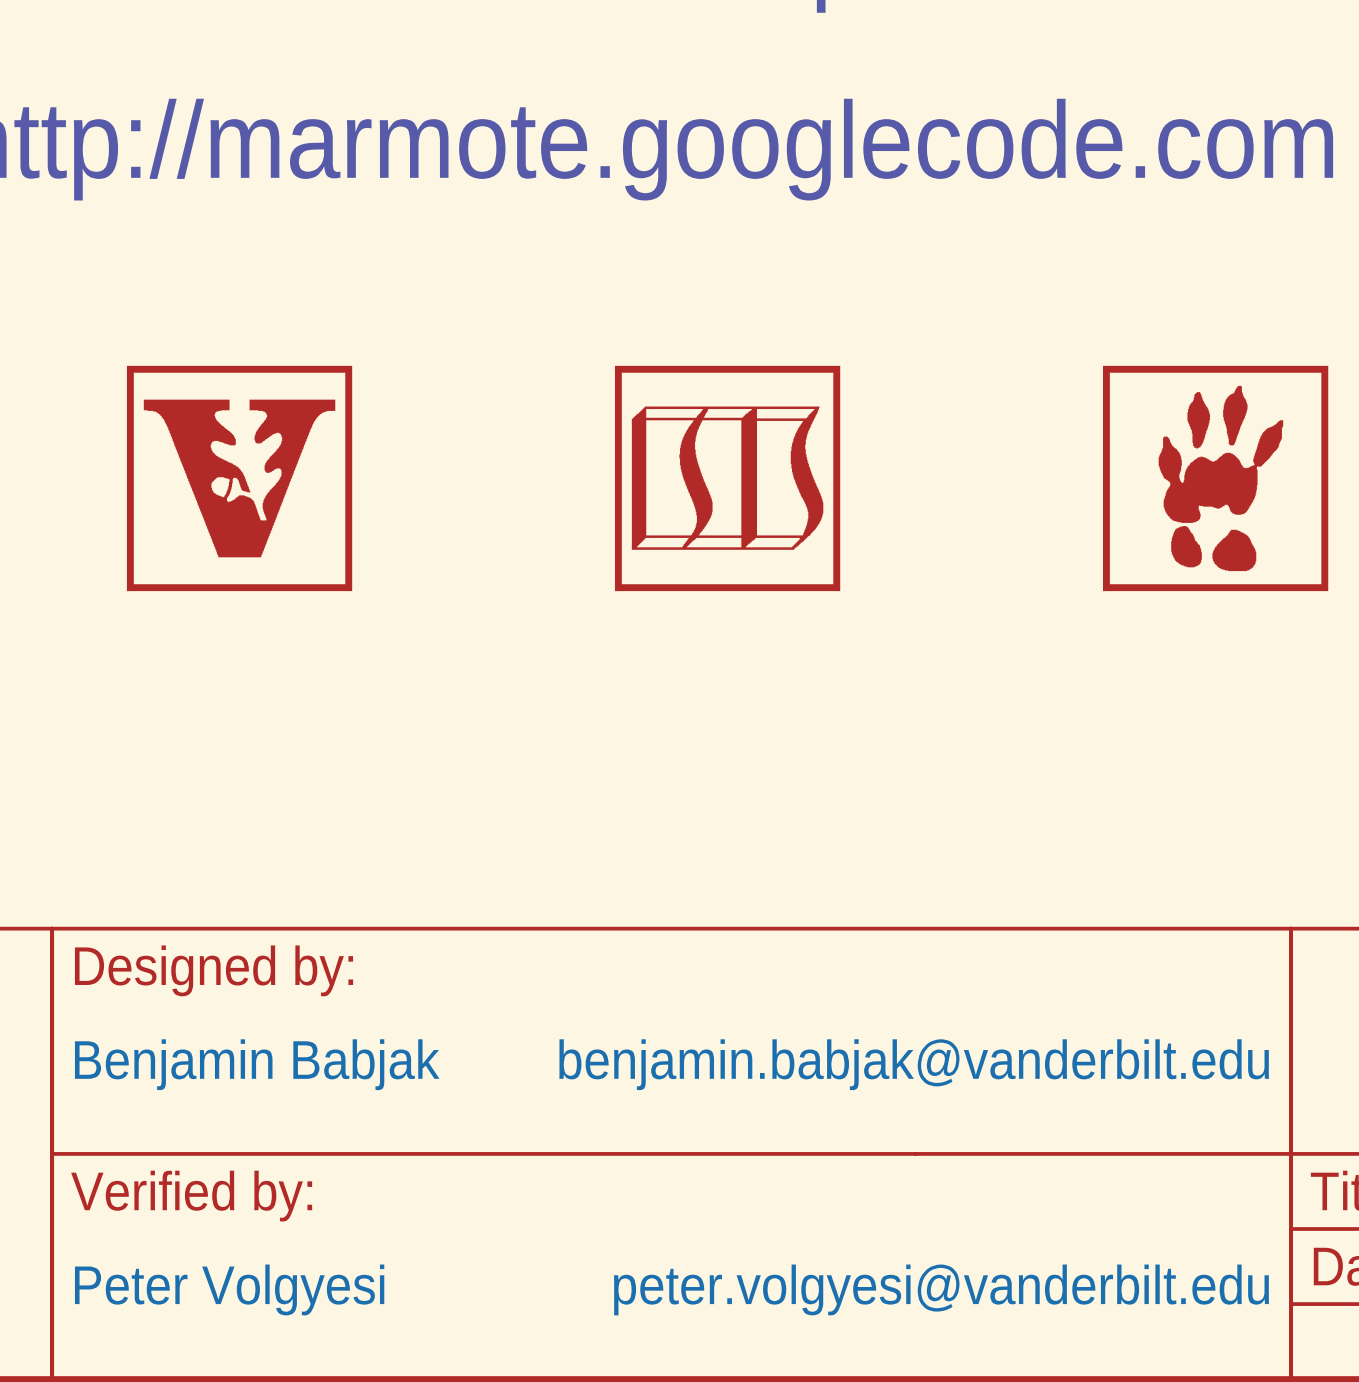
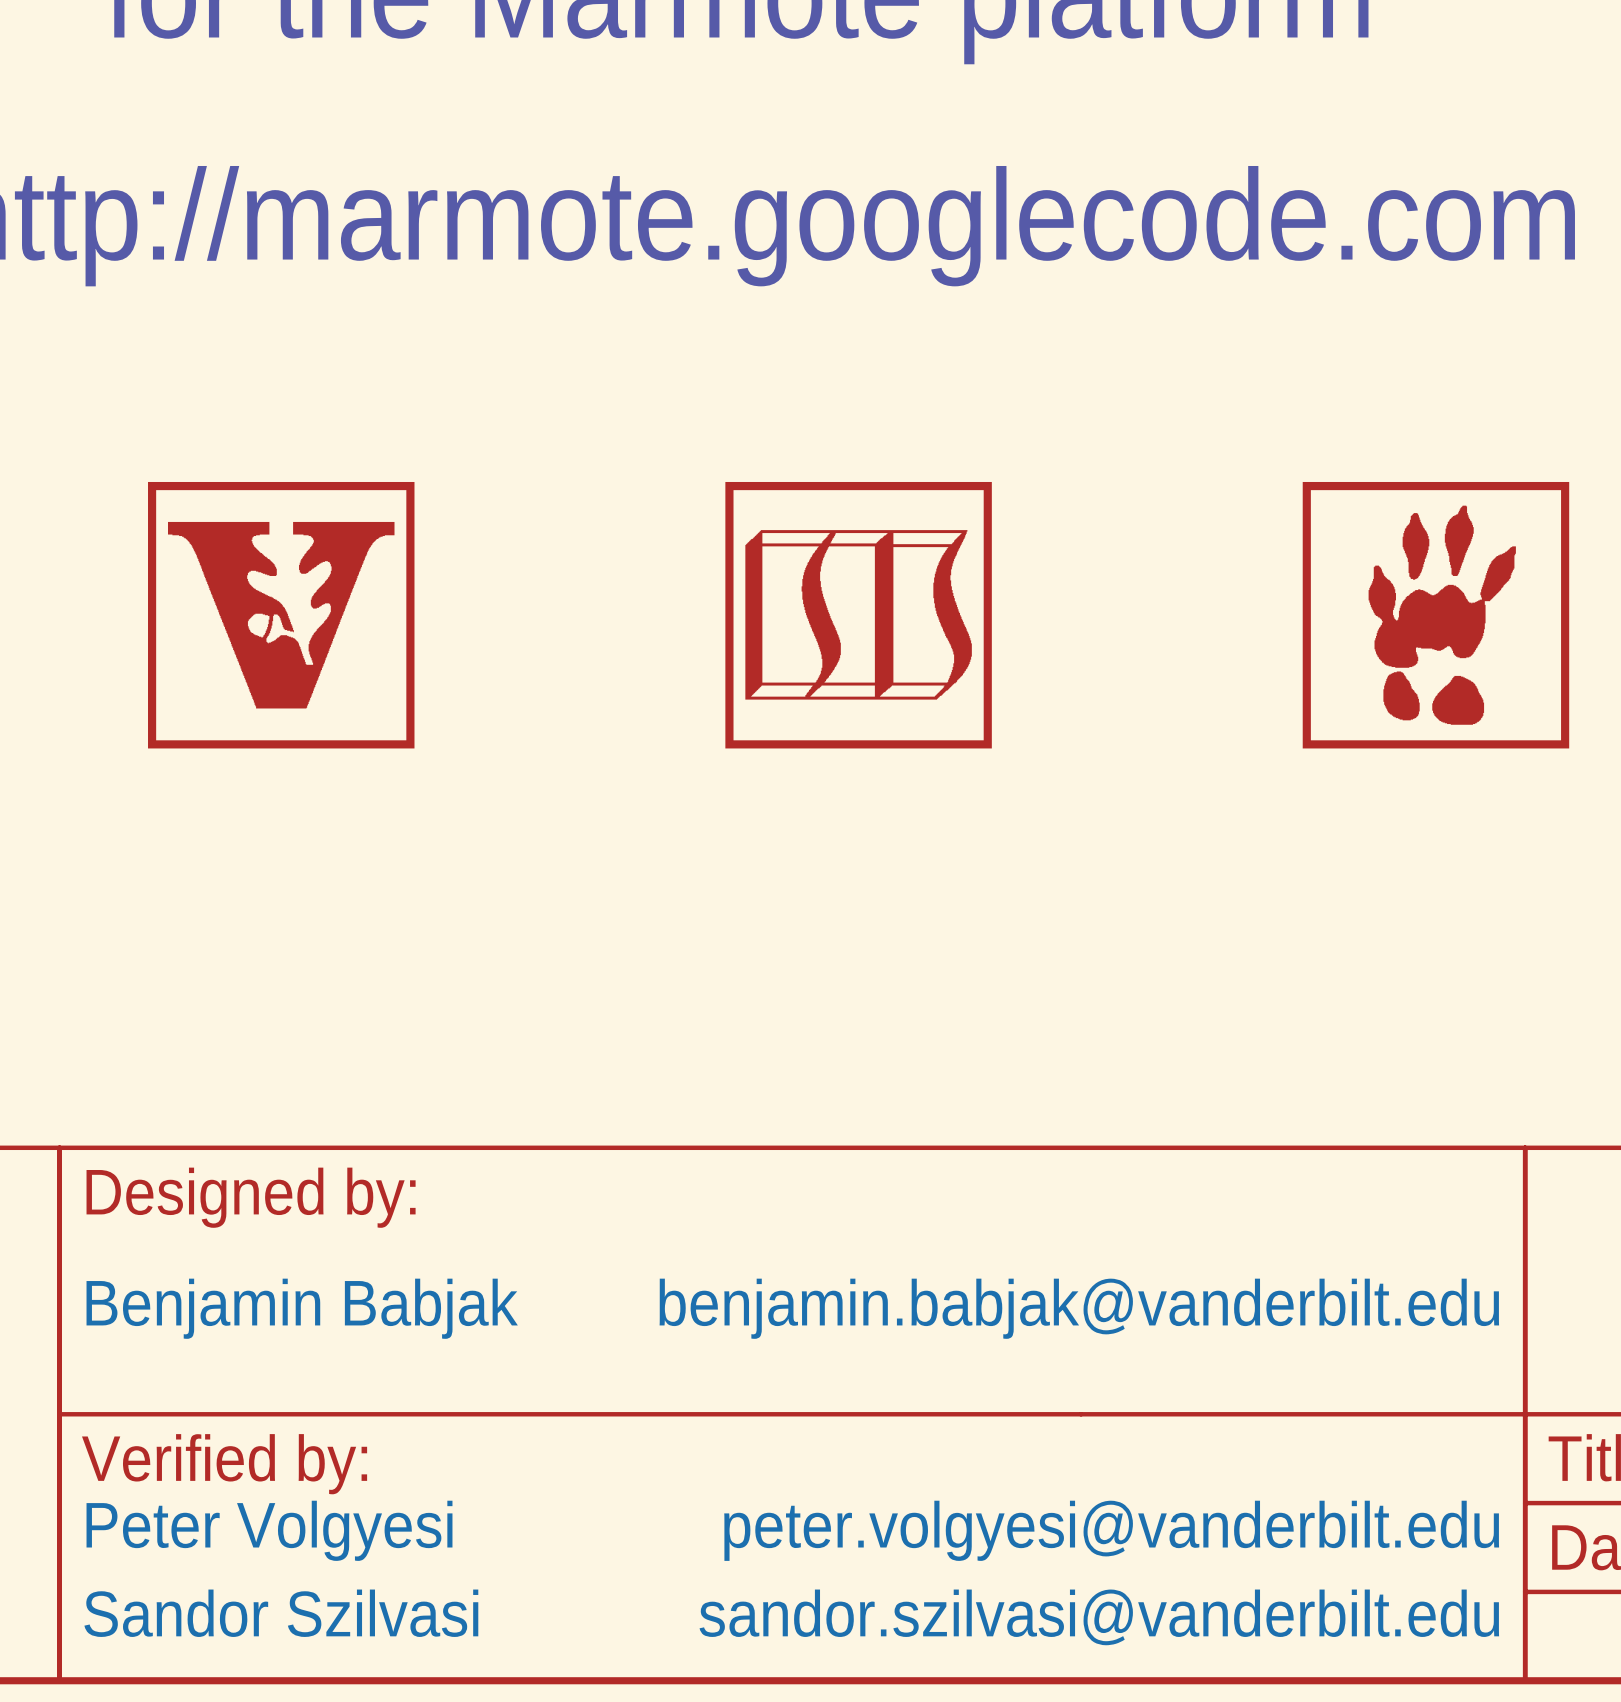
text position: Peter Volgyesi (229, 1289) -> Peter Volgyesi (269, 1530)
text position: peter.volgyesi@vanderbilt.edu (941, 1289) -> peter.volgyesi@vanderbilt.edu (1111, 1530)
text: none -> Sandor Szilvasi (281, 1613)
text: none -> sandor.szilvasi@vanderbilt.edu (1099, 1617)

